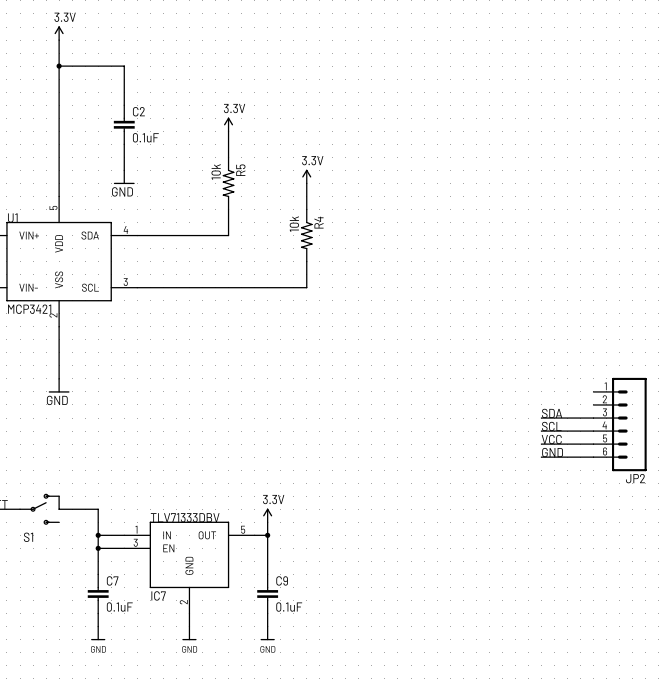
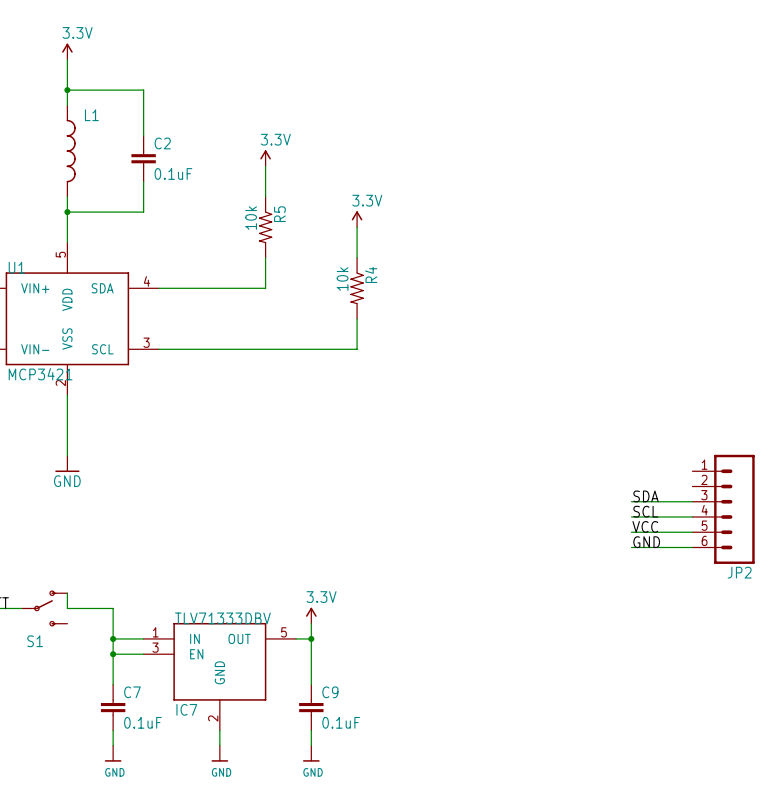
wire: (59, 79) (59, 157) -> none
L1: none -> (71, 151)
wire: none -> (67, 212) (143, 212)
junction: none -> (67, 212)
power symbol: GND (124, 177) -> none

